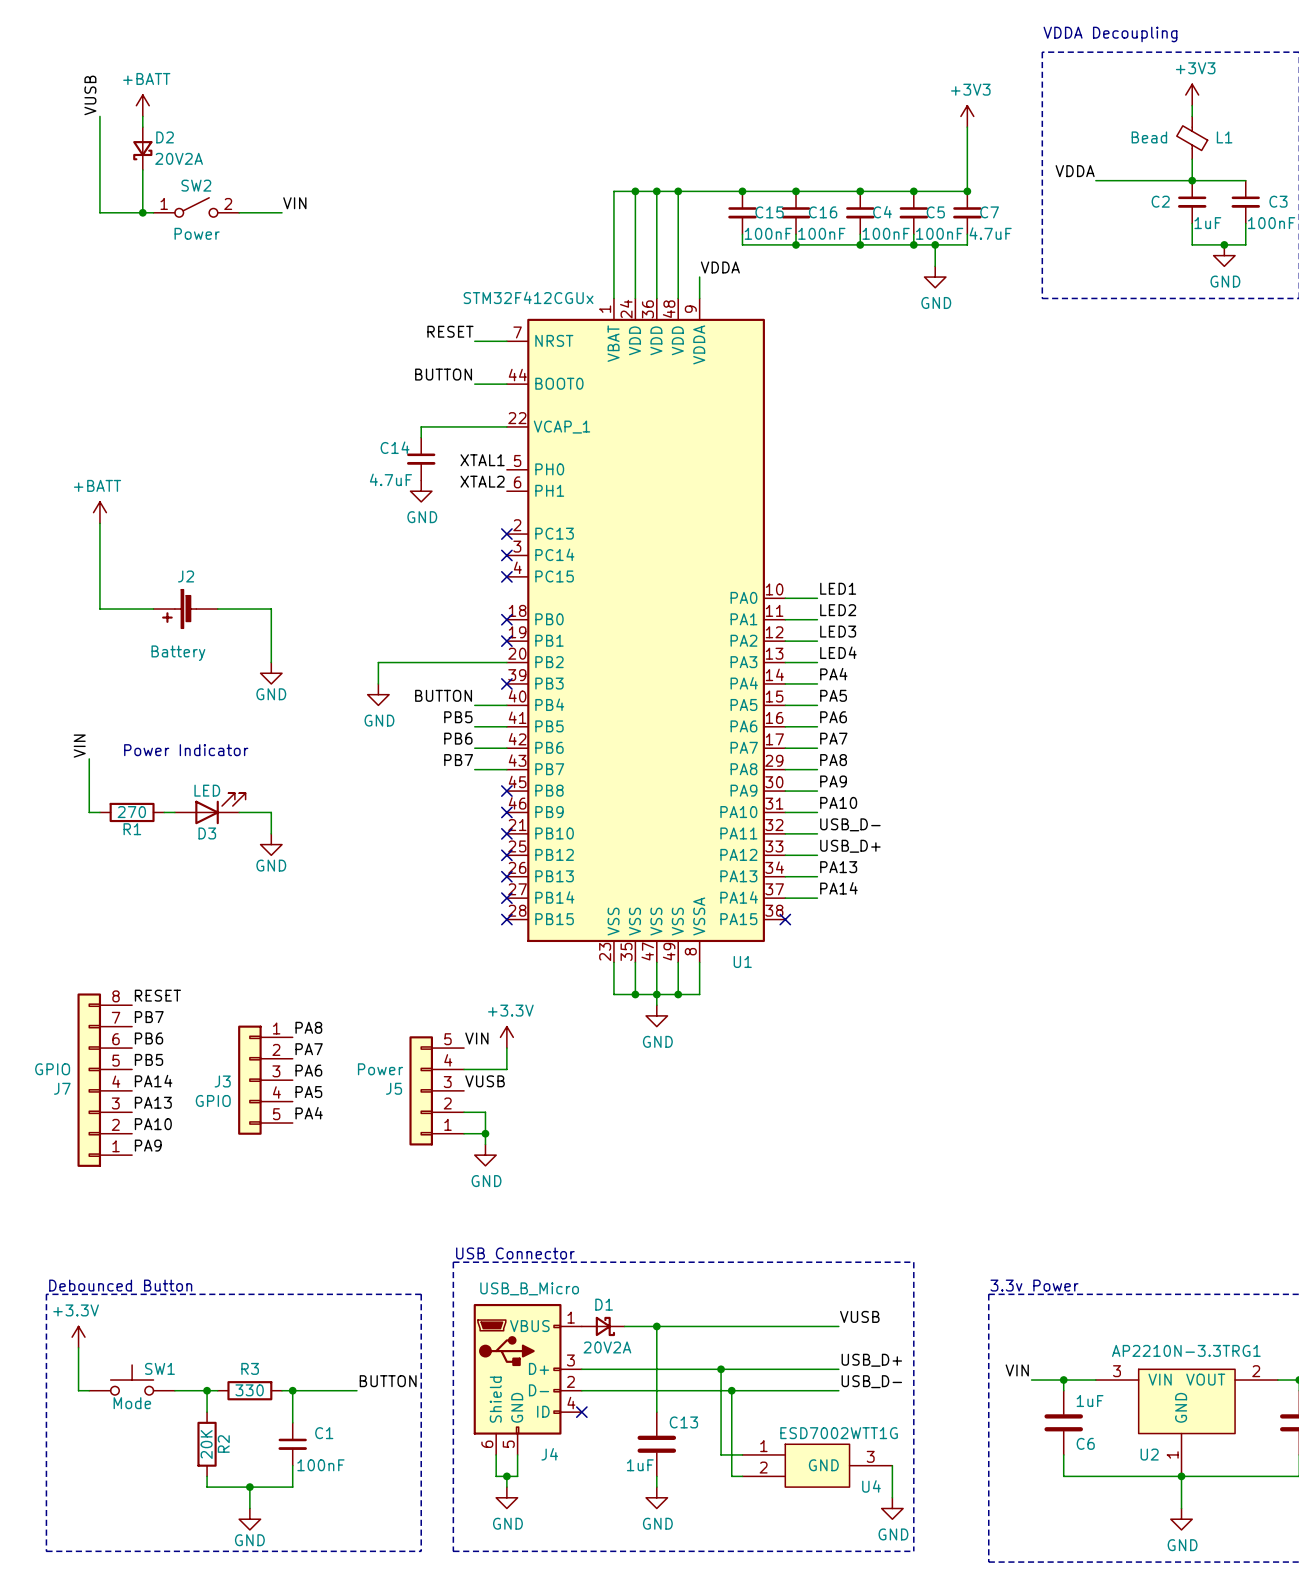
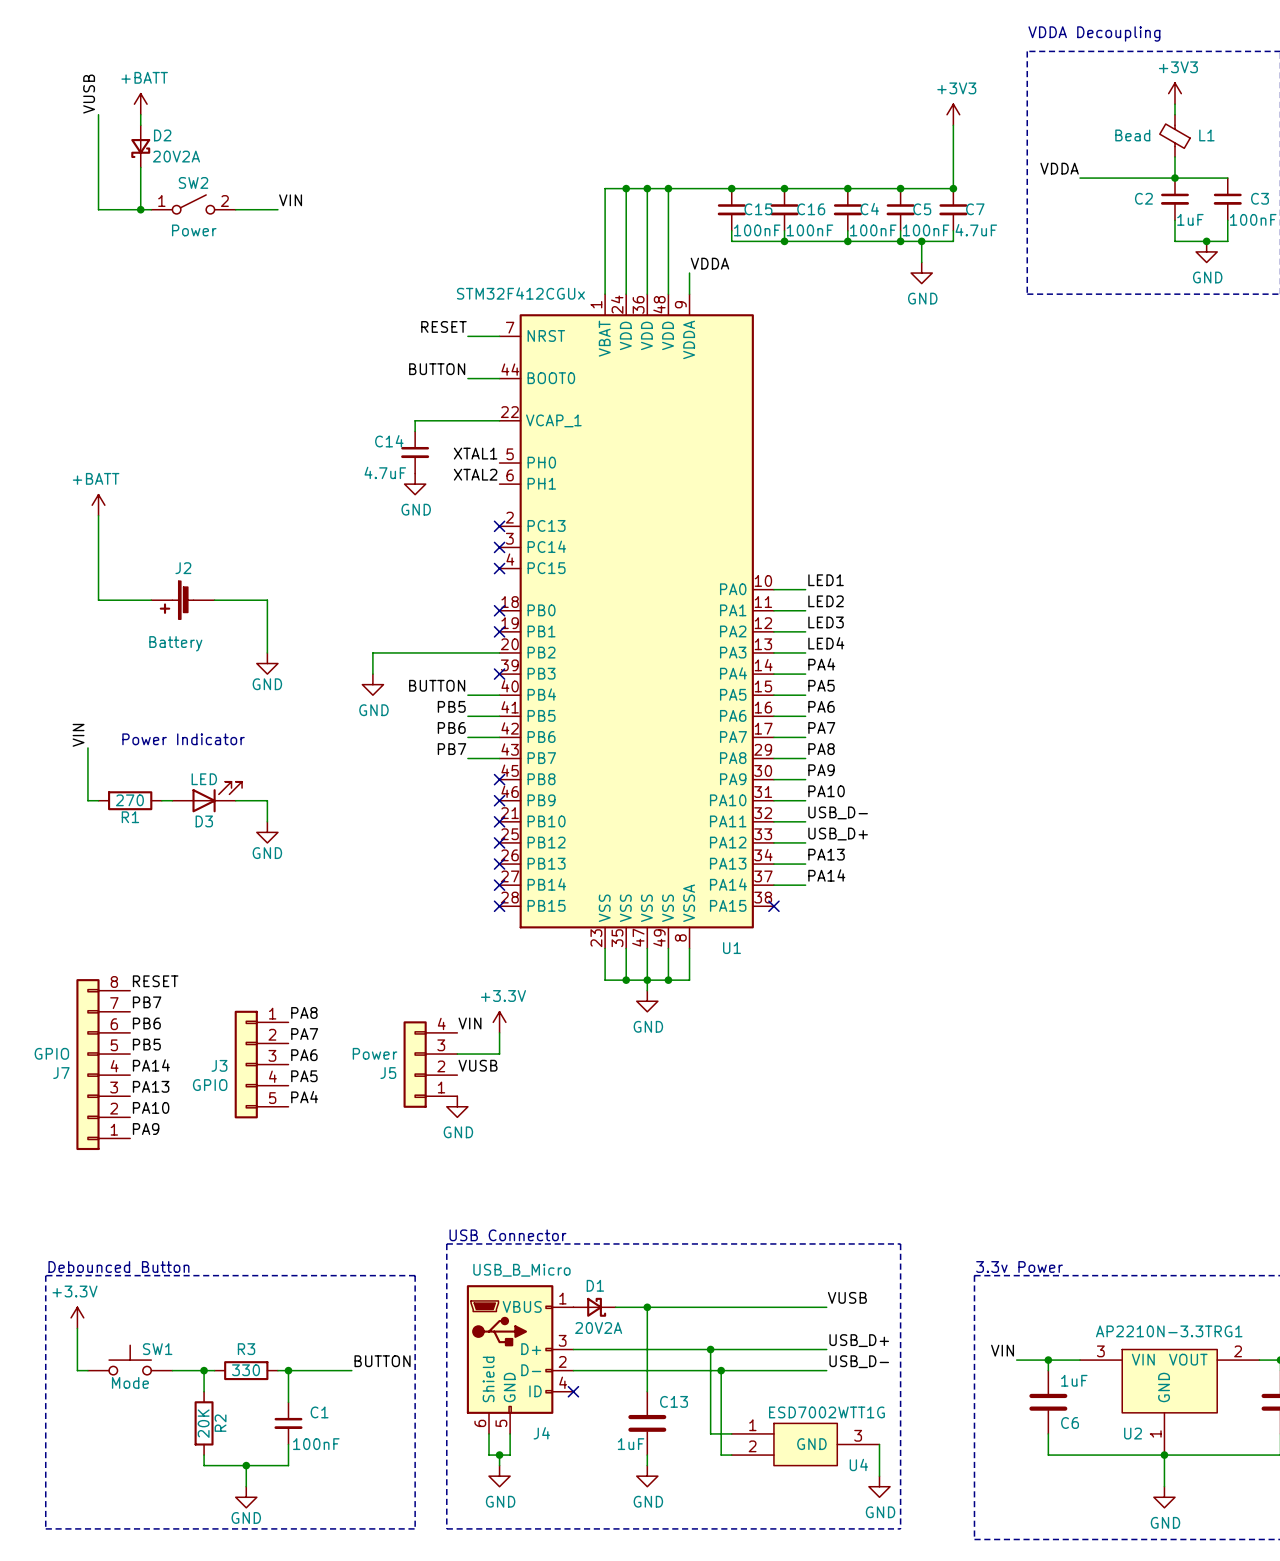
J5 symbol: [409, 1036, 465, 1146] -> [403, 1021, 458, 1108]
wire: (464, 1112) (485, 1112) (485, 1144) -> none
wire: (464, 1133) (485, 1133) -> none
junction: (485, 1133) -> none
power symbol position: GND (485, 1155) -> GND (457, 1106)

